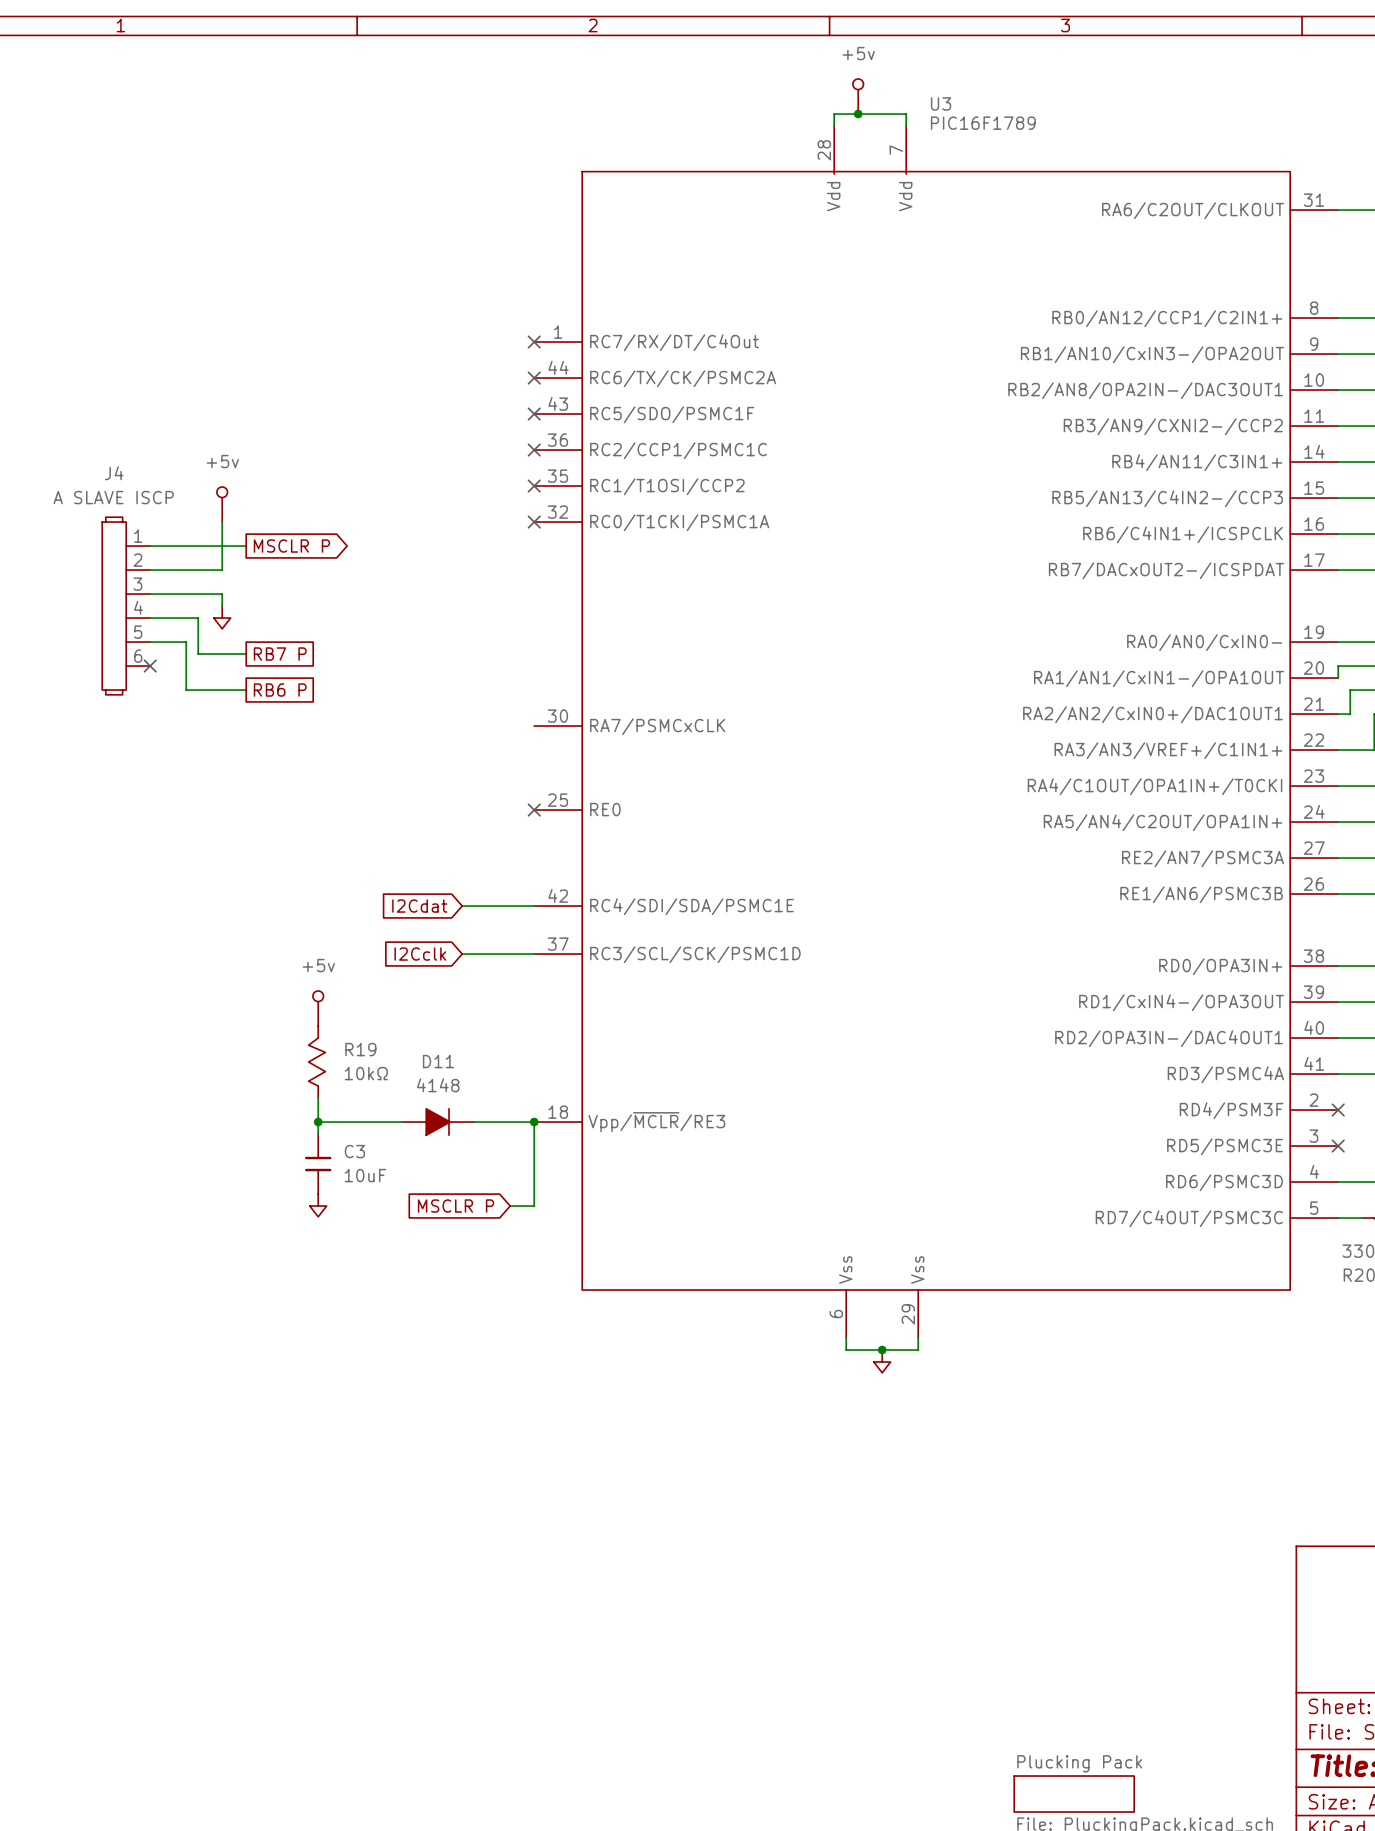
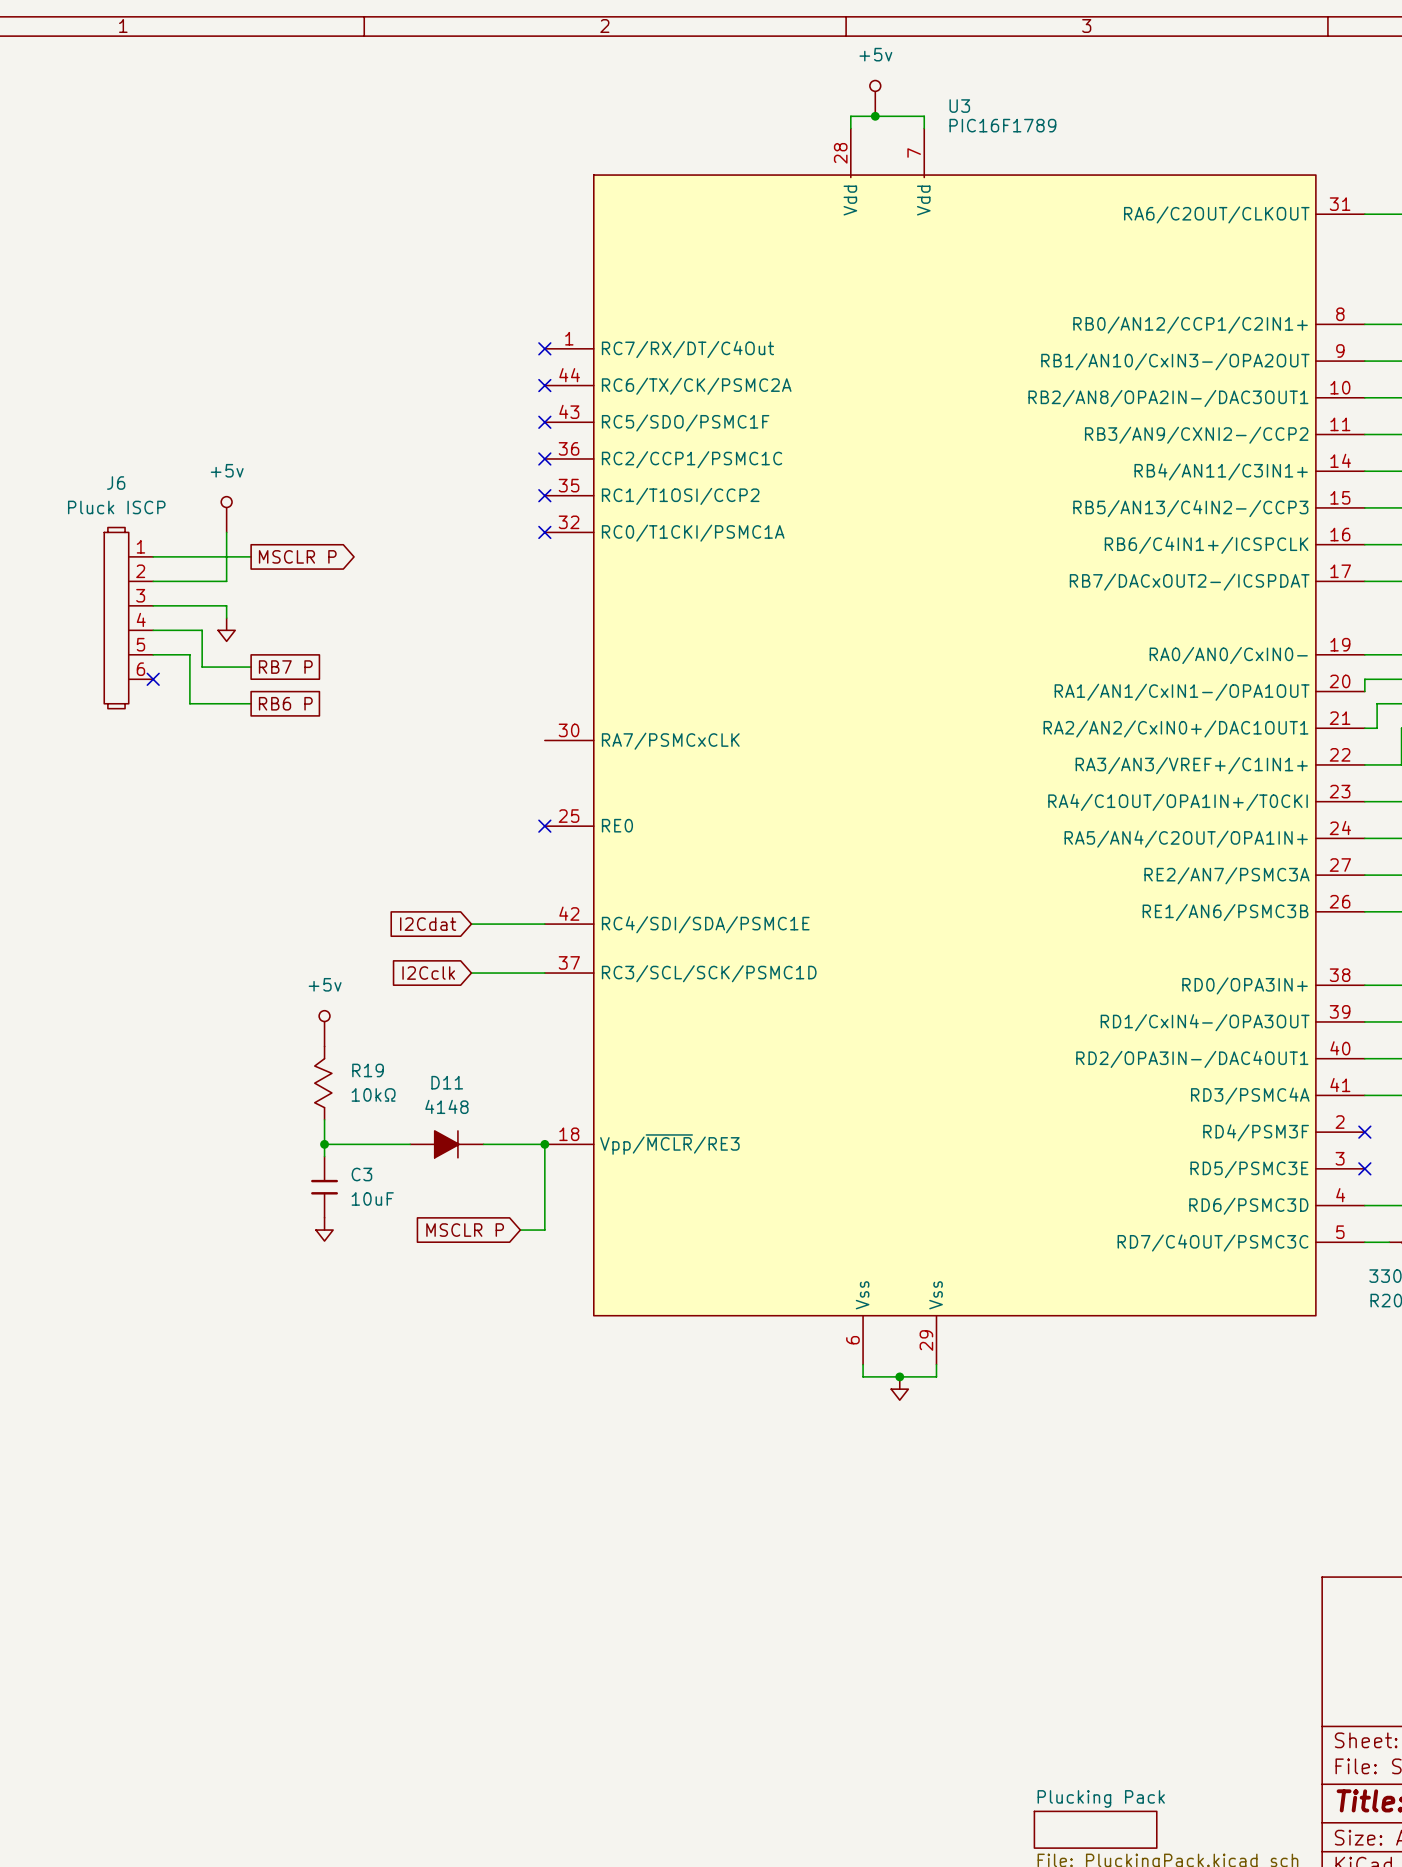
J4 name: J4 (114, 473) -> J6 (116, 483)
J4 value: A SLAVE ISCP (113, 497) -> Pluck ISCP (116, 507)

